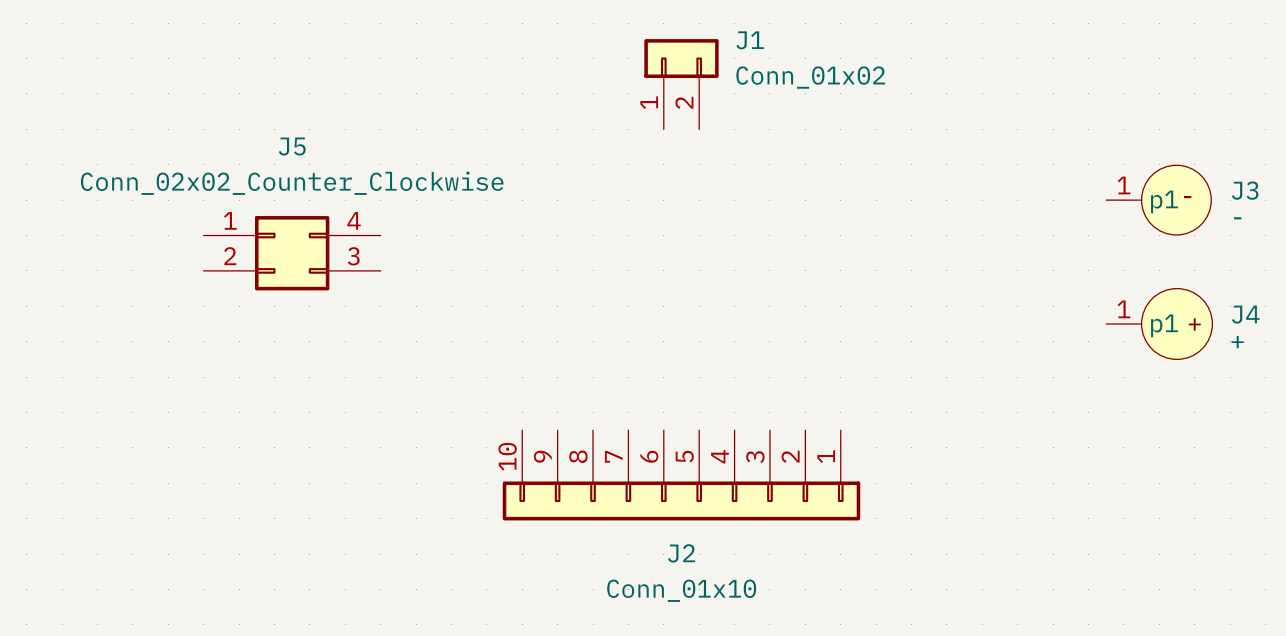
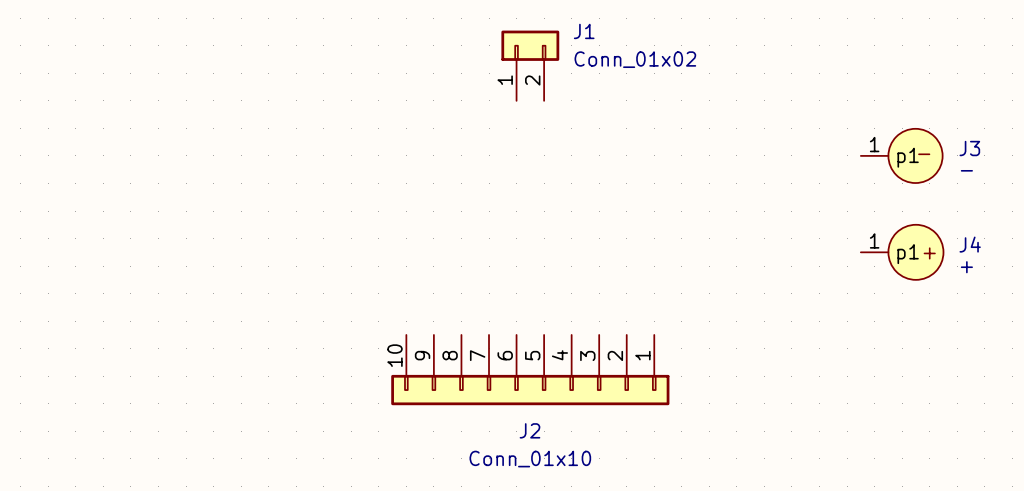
J5: Conn_02x02_Counter_Clockwise (292, 253) -> none

